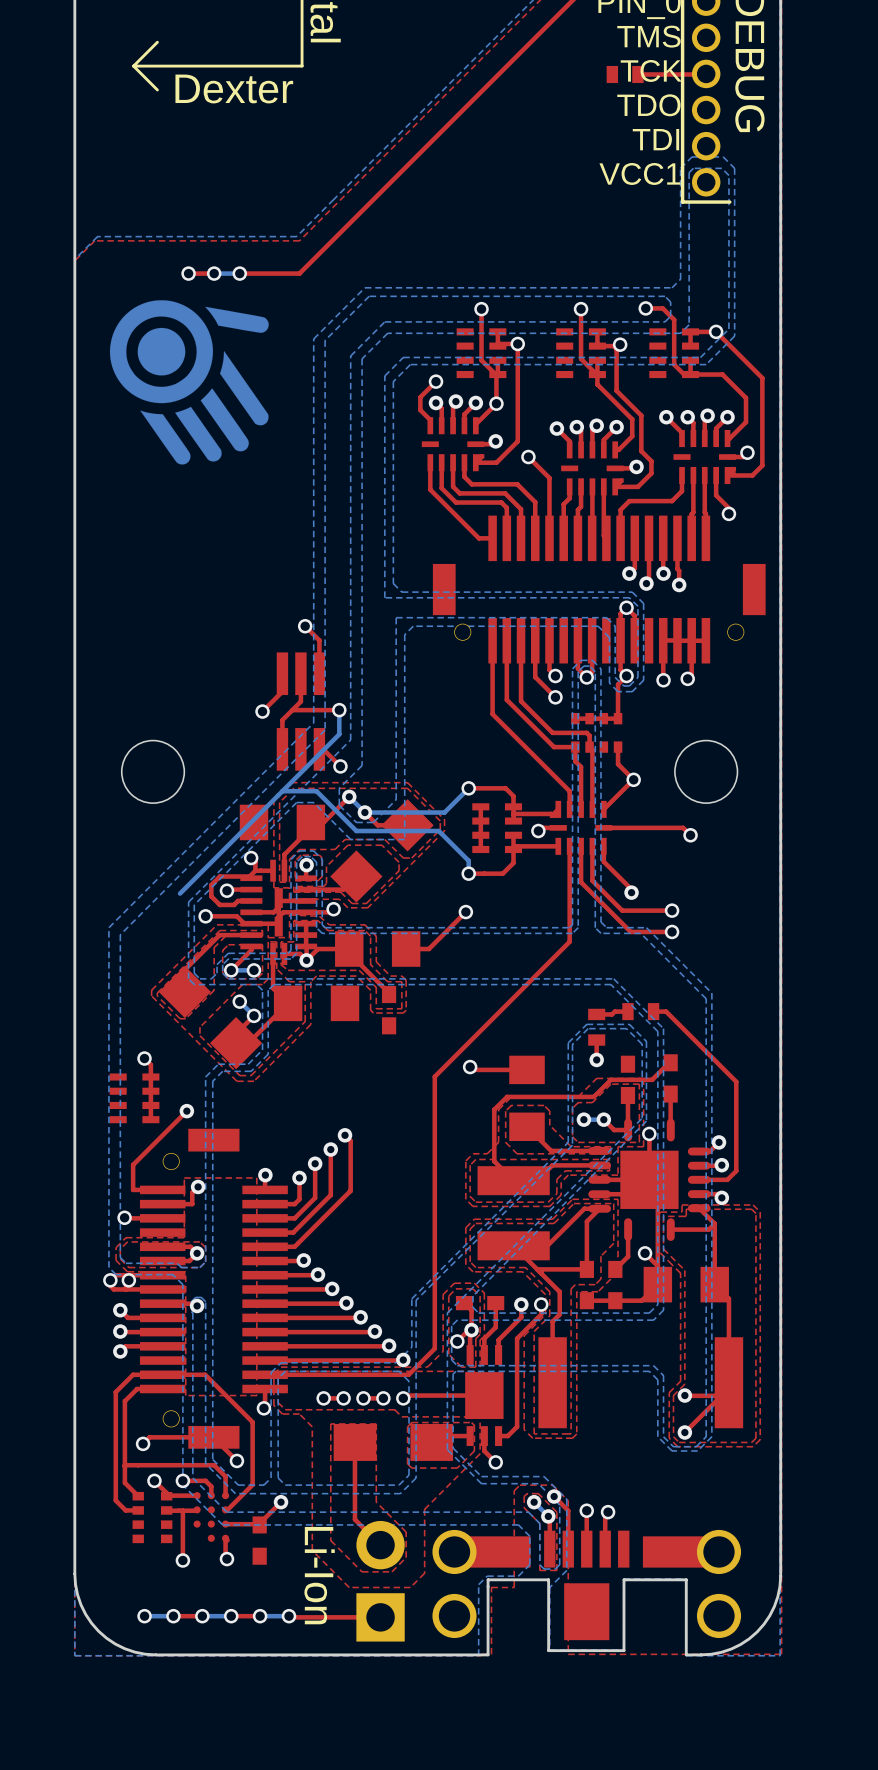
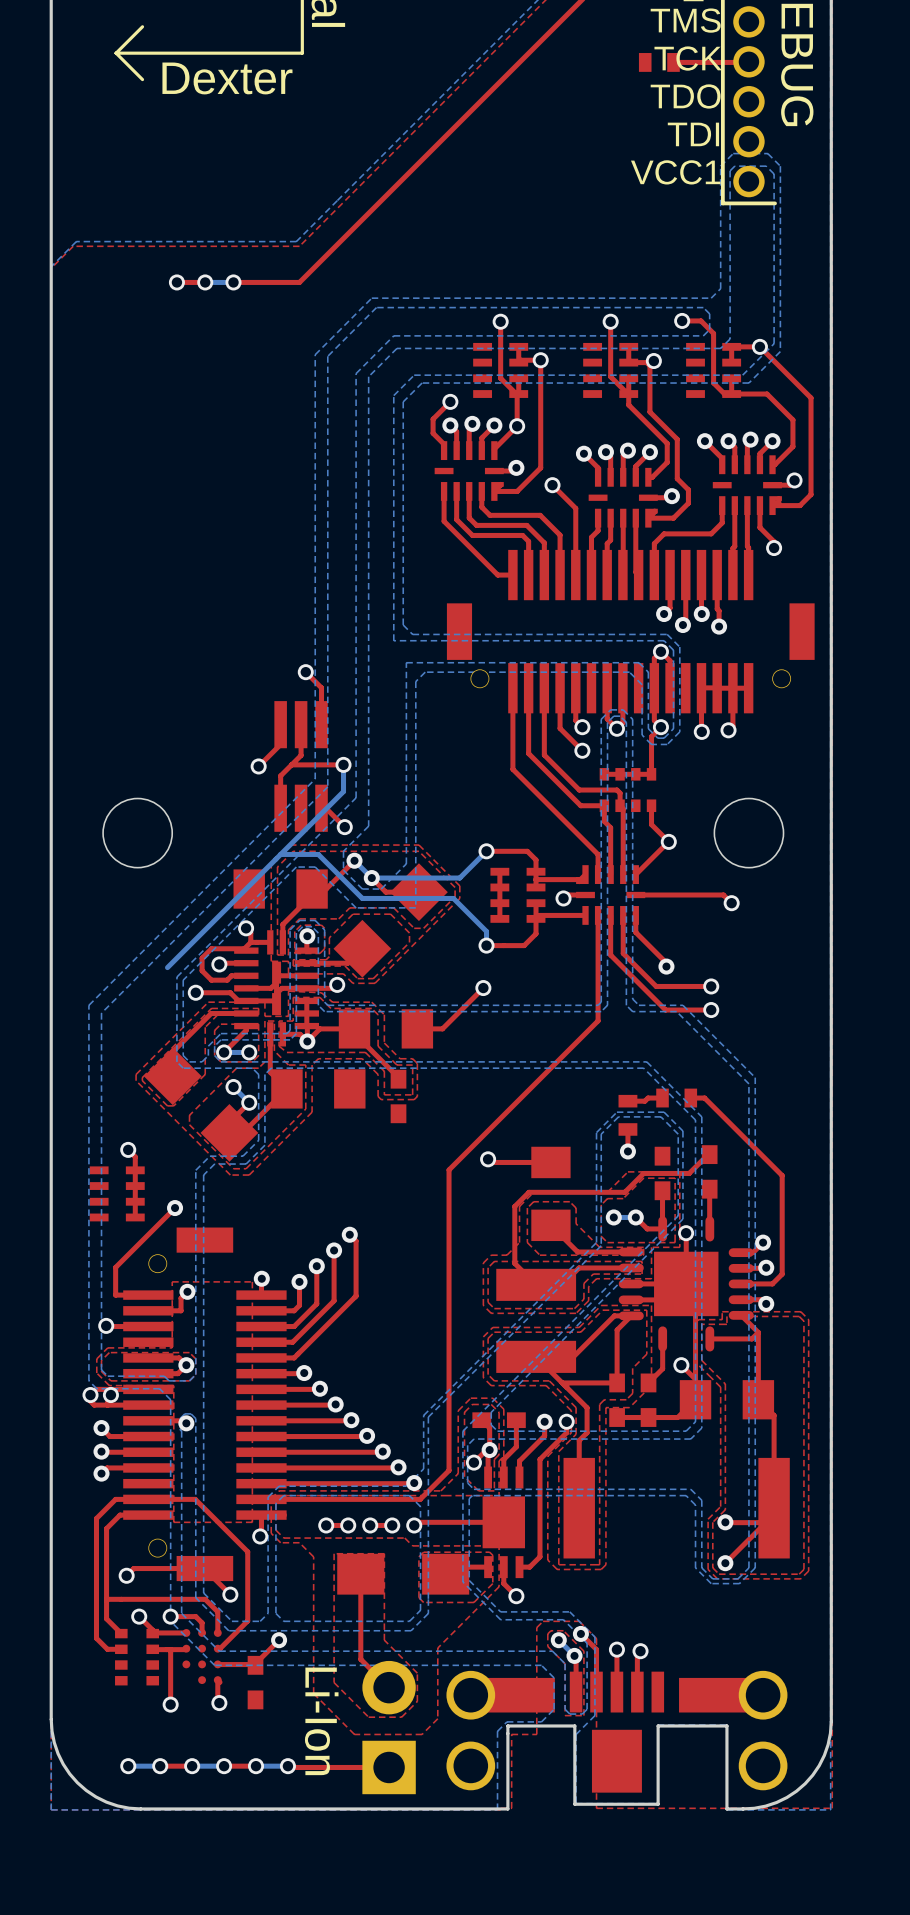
drawing: [109, 300, 269, 465] -> none

